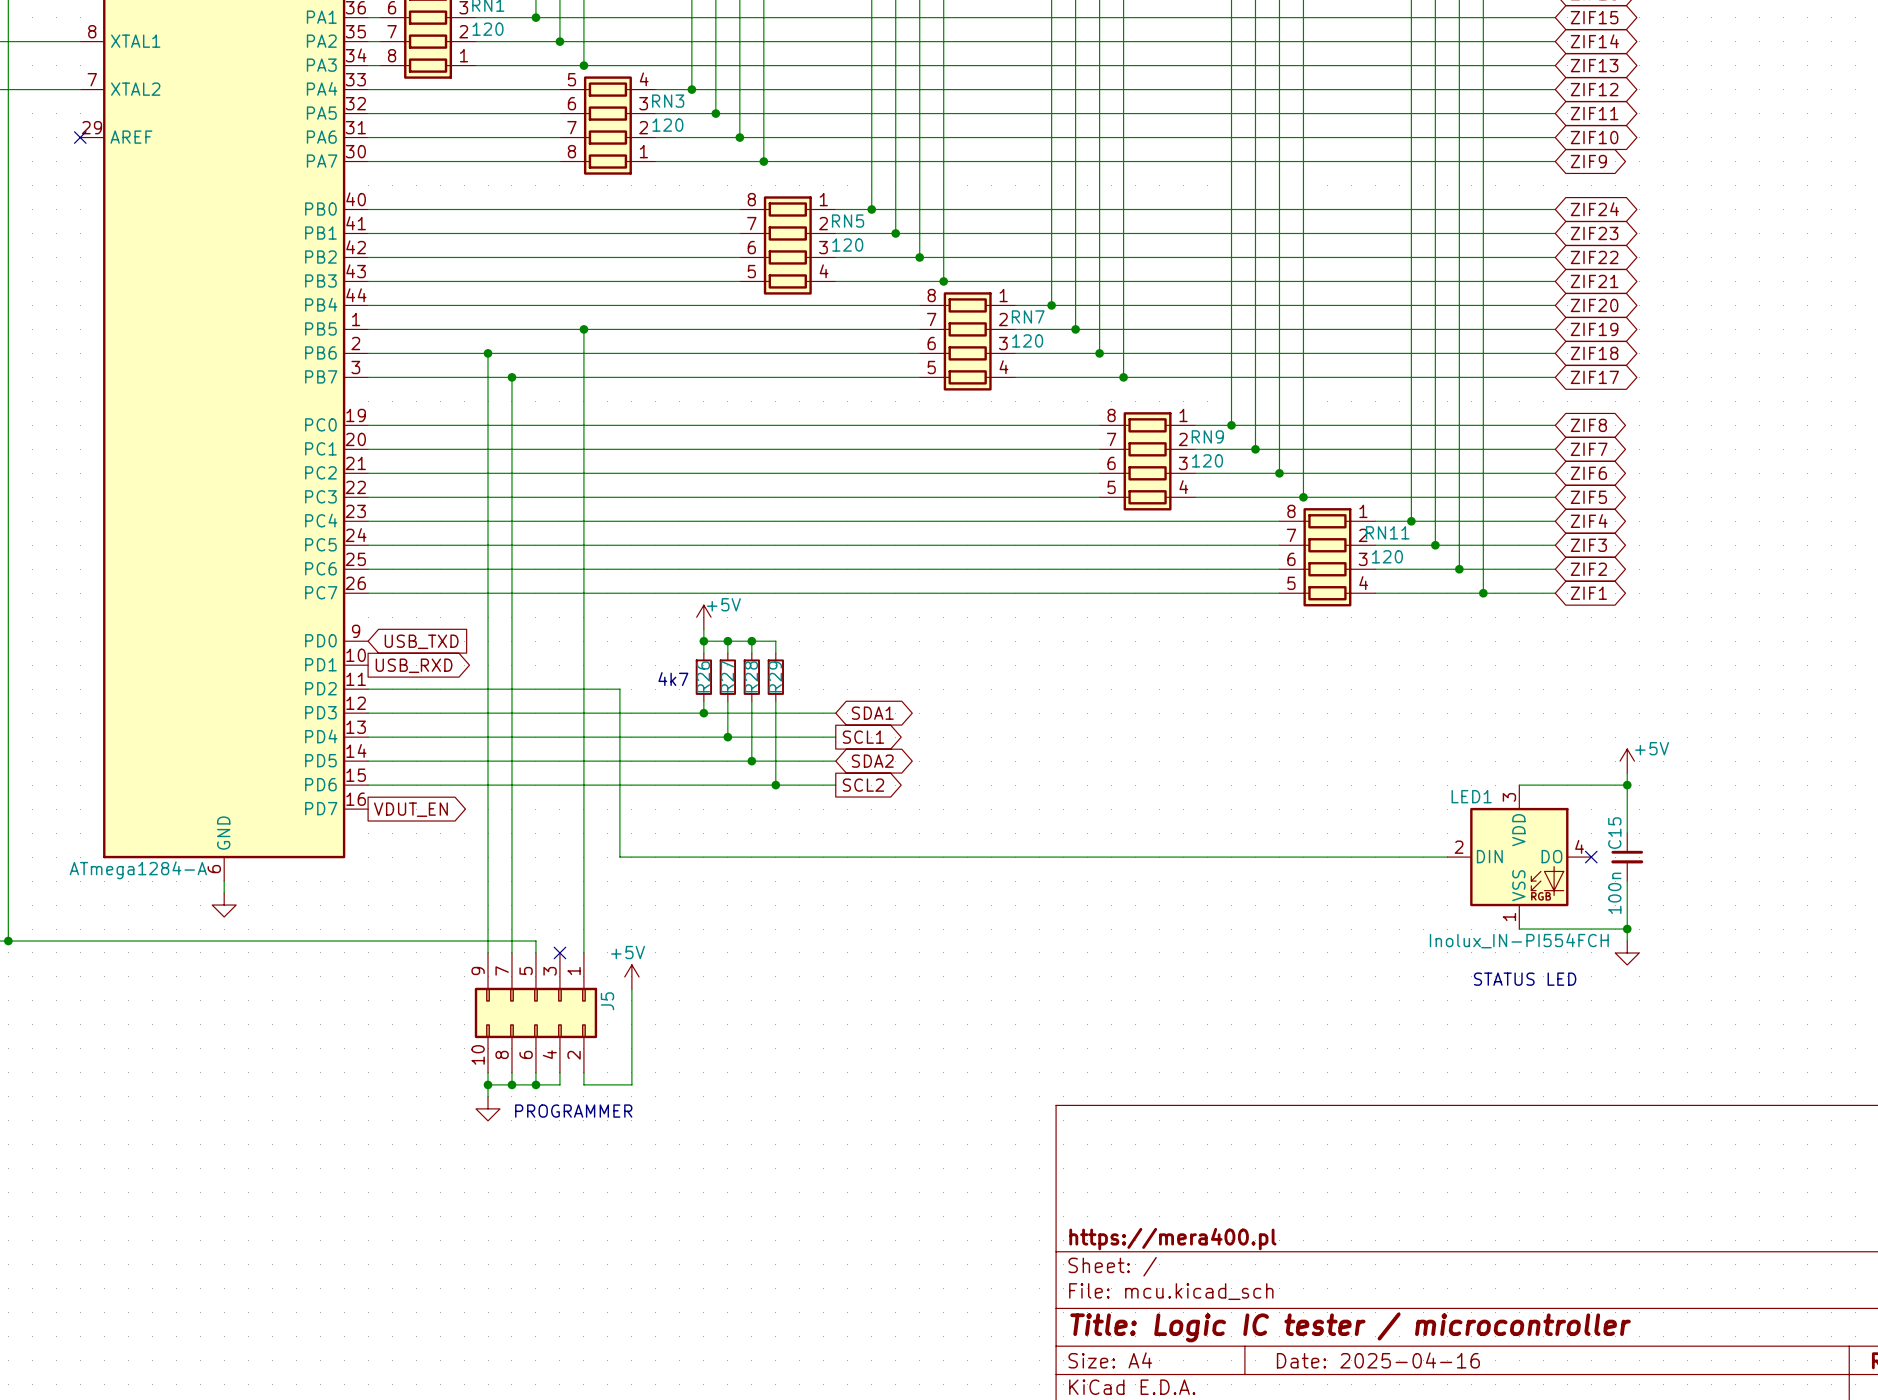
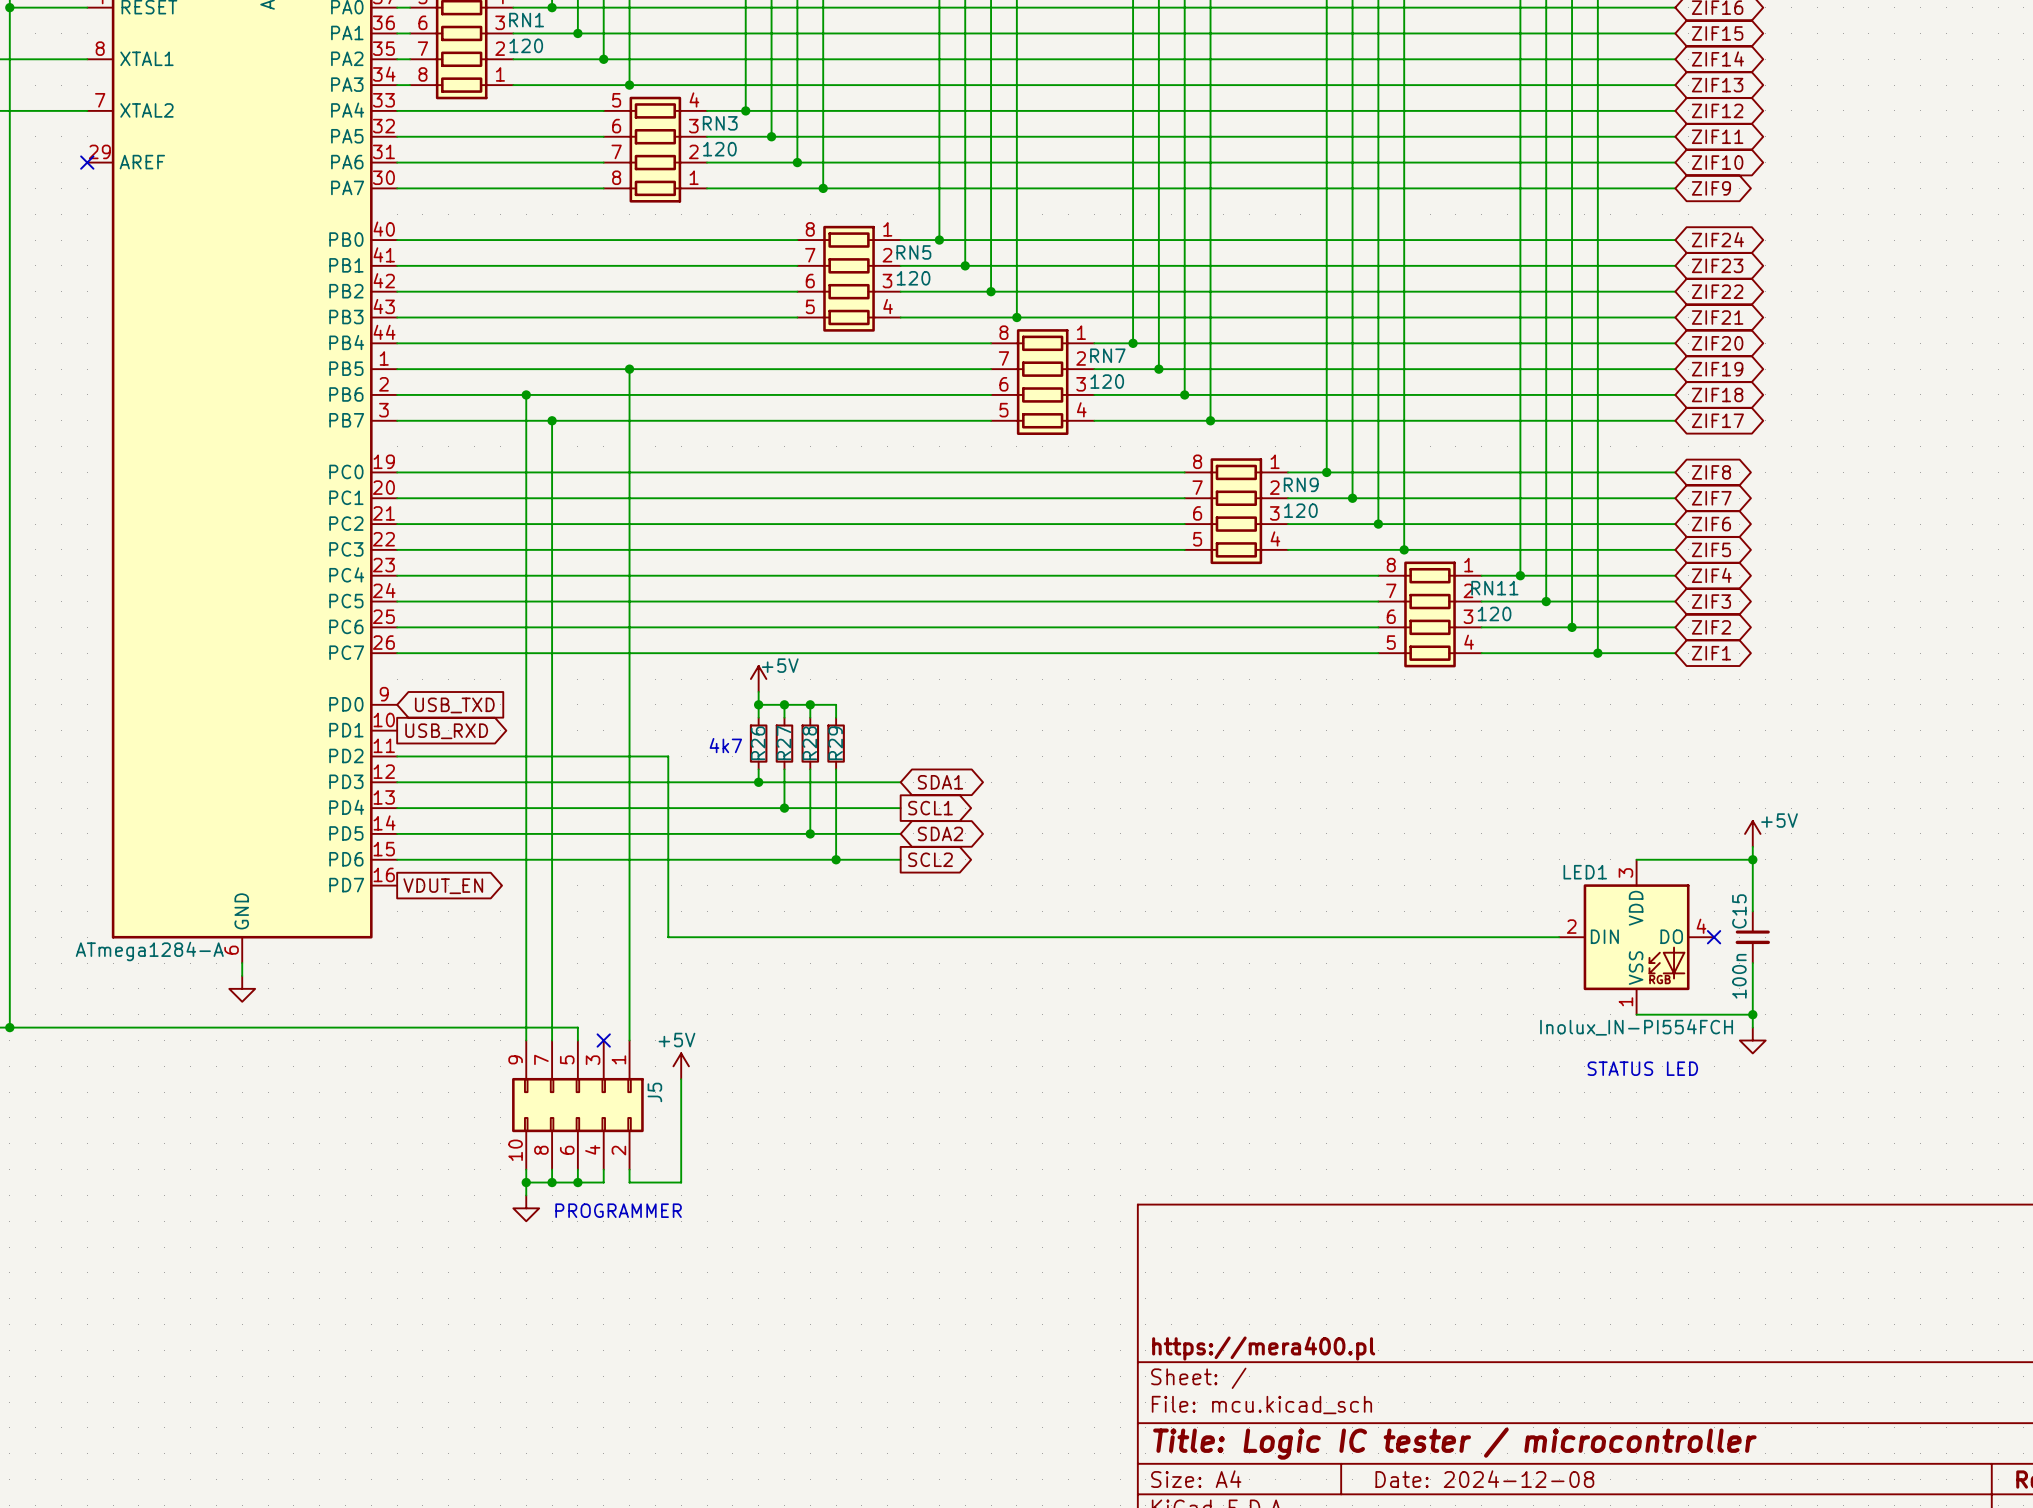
title block: Date: 2025-04-16 (1378, 1360) -> Date: 2024-12-08 (1484, 1479)

